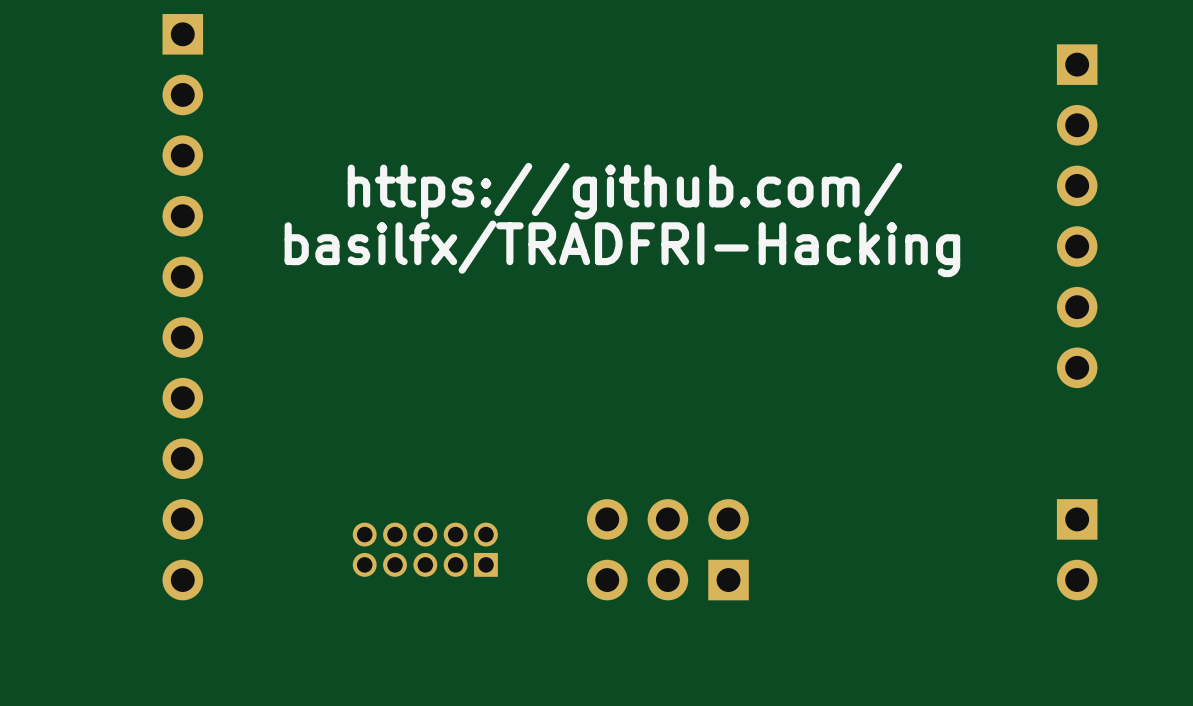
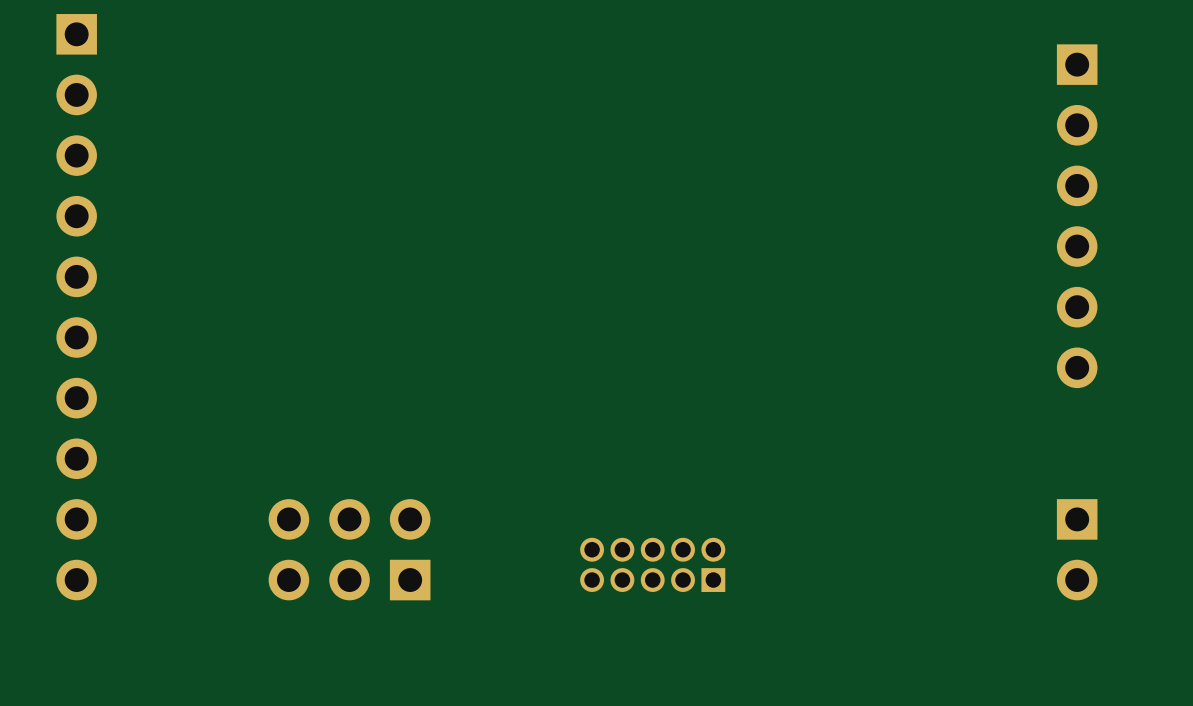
text: https://github.com/ (624, 191) -> none
text: basilfx/TRADFRI-Hacking (622, 248) -> none
part position: (182, 307) -> (76, 307)
part footprint: [586, 499, 749, 601] -> [580, 537, 726, 592]
part: none -> (349, 549)
part: (425, 549) -> none

